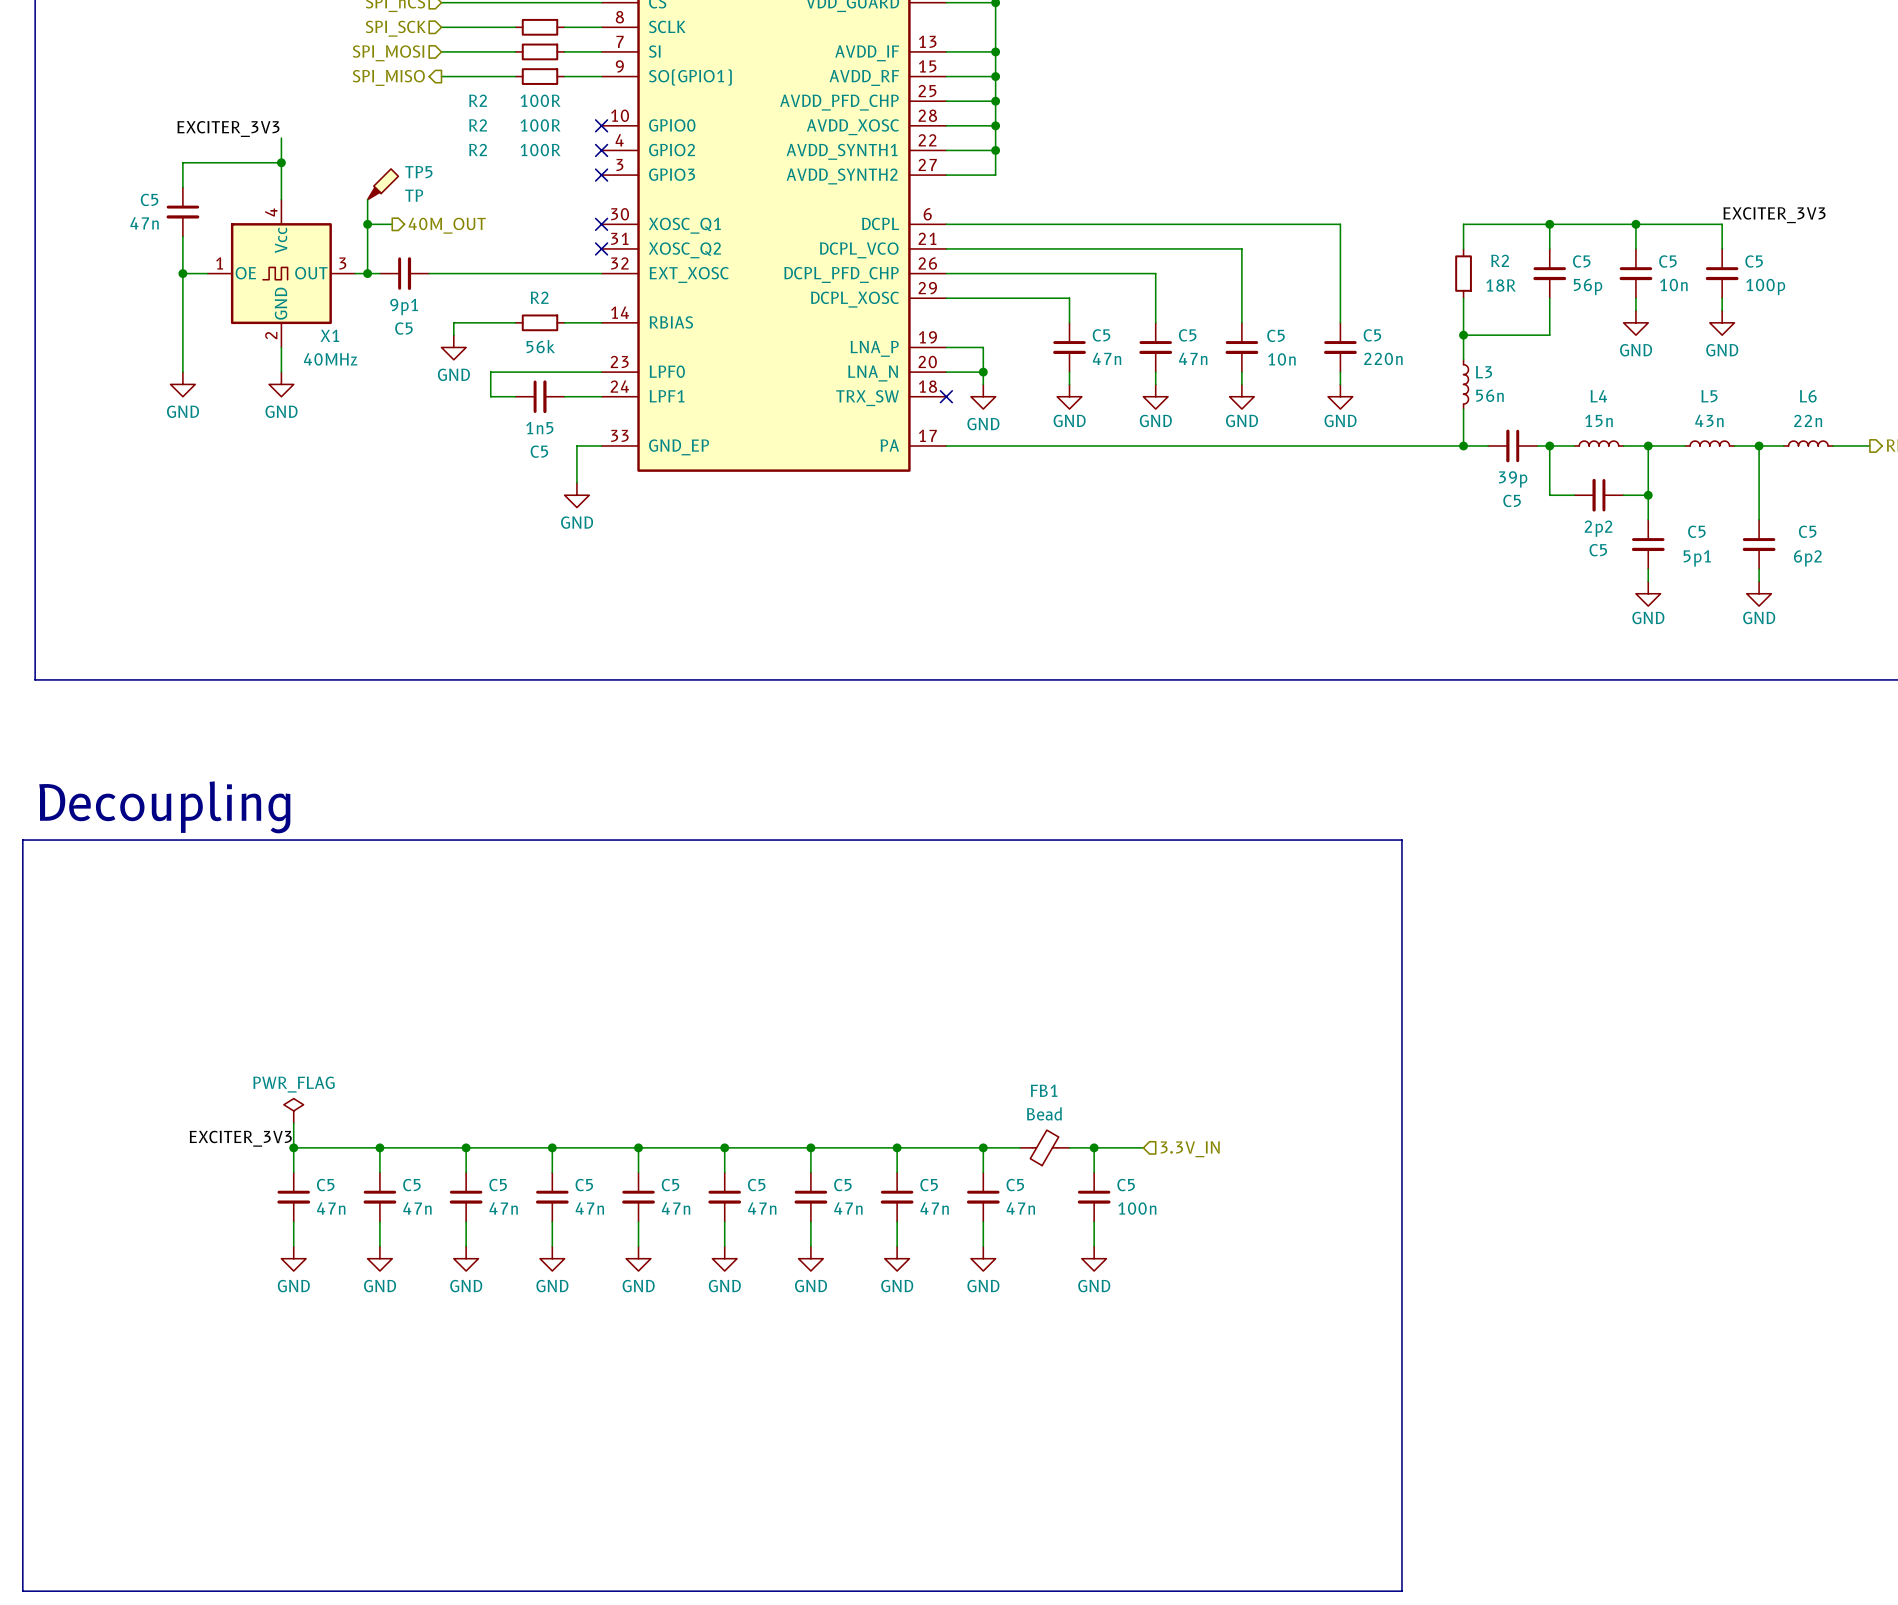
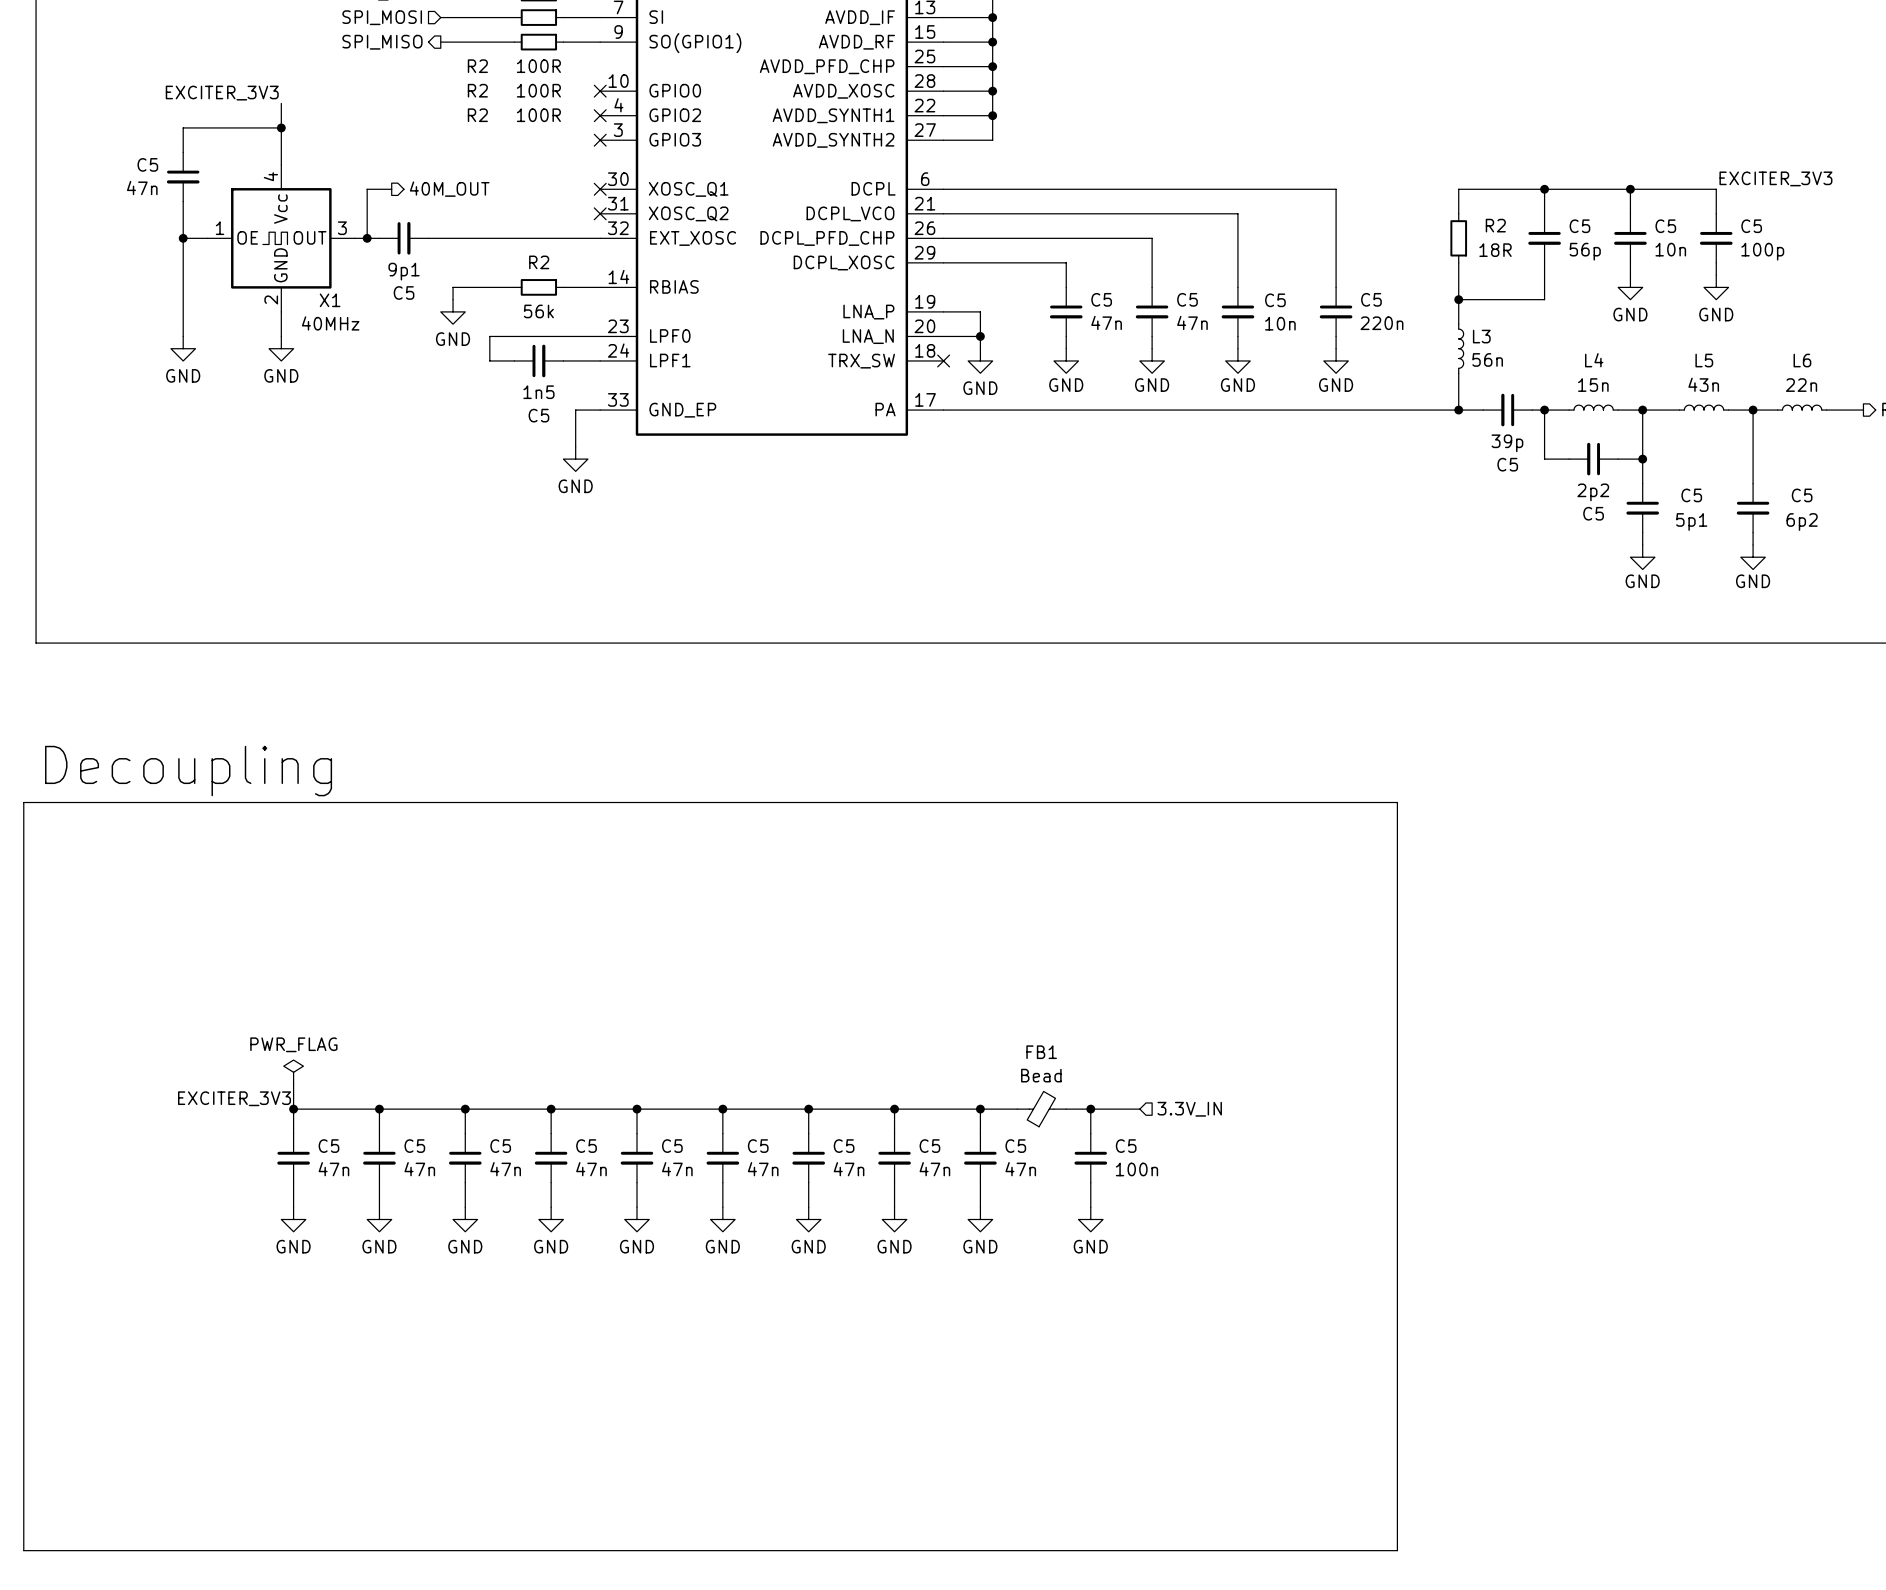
TP5: TP (383, 184) -> none
wire: (367, 199) (367, 224) -> none
junction: (367, 224) -> none

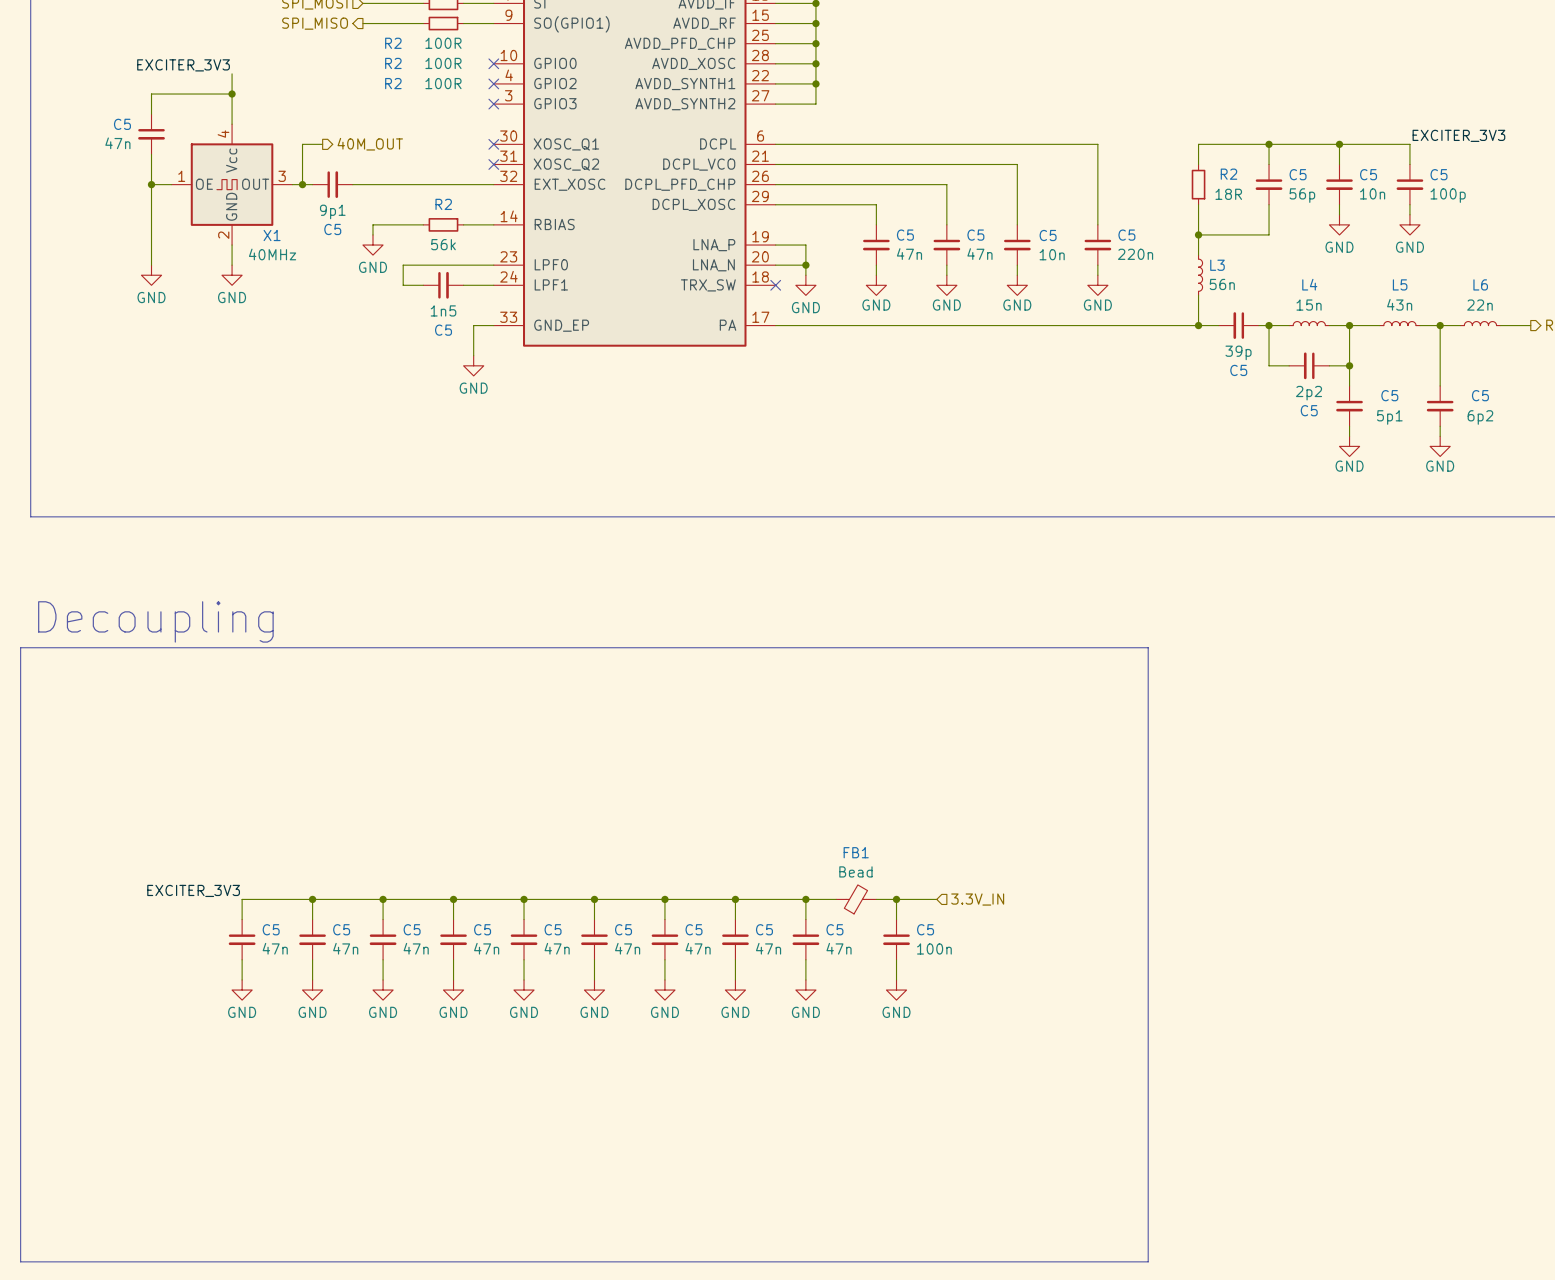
power symbol: PWR_FLAG (293, 1072) -> none
wire: (293, 1084) (293, 1109) -> none
junction: (293, 1109) -> none

